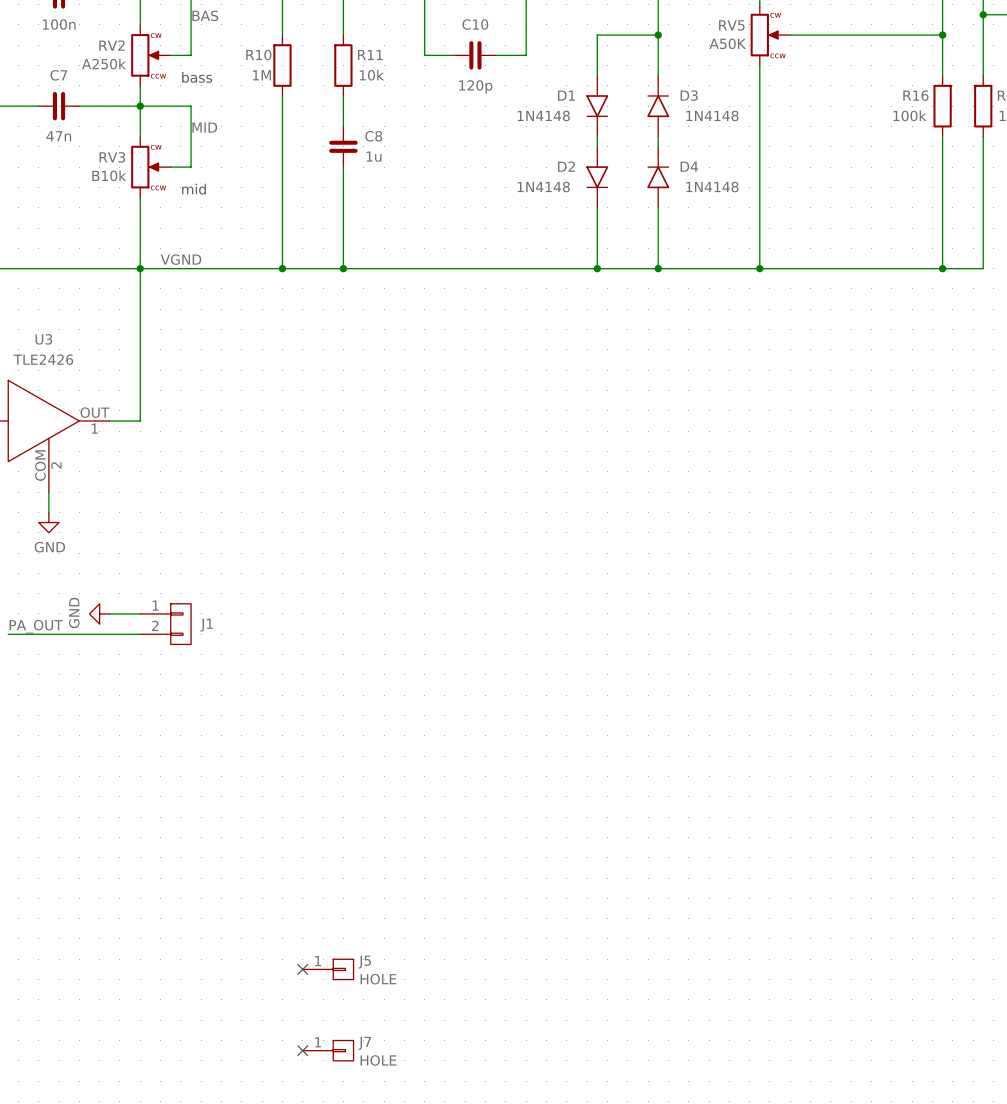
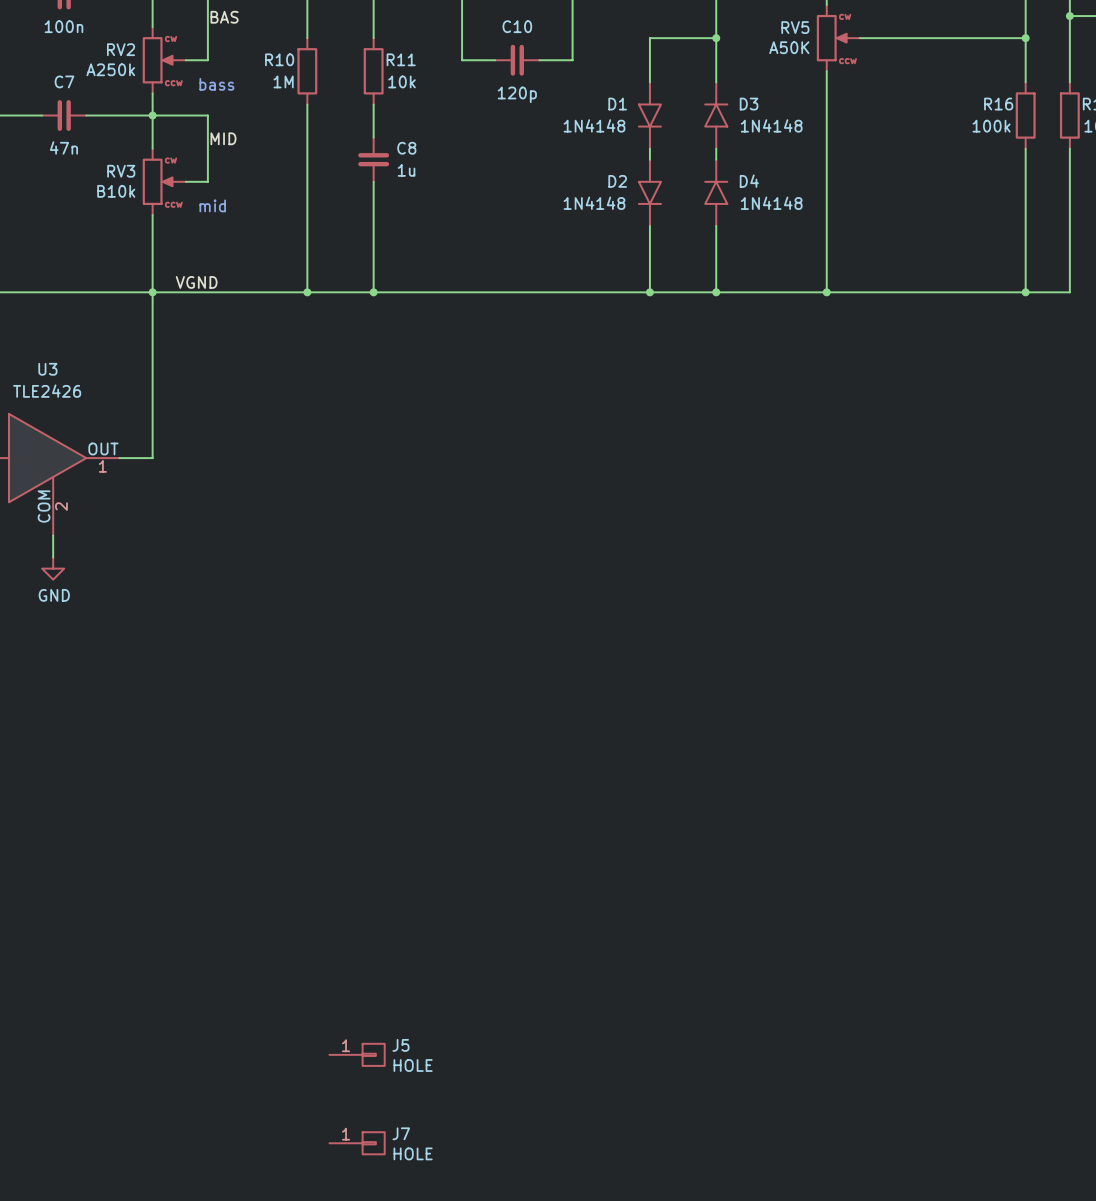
power symbol: GND (99, 613) -> none
wire: (109, 613) (140, 613) -> none
J1: (165, 624) -> none
label: PA_OUT (36, 626) -> none
wire: (8, 634) (140, 634) -> none
no-connect mark: (302, 969) -> none
no-connect mark: (302, 1050) -> none

